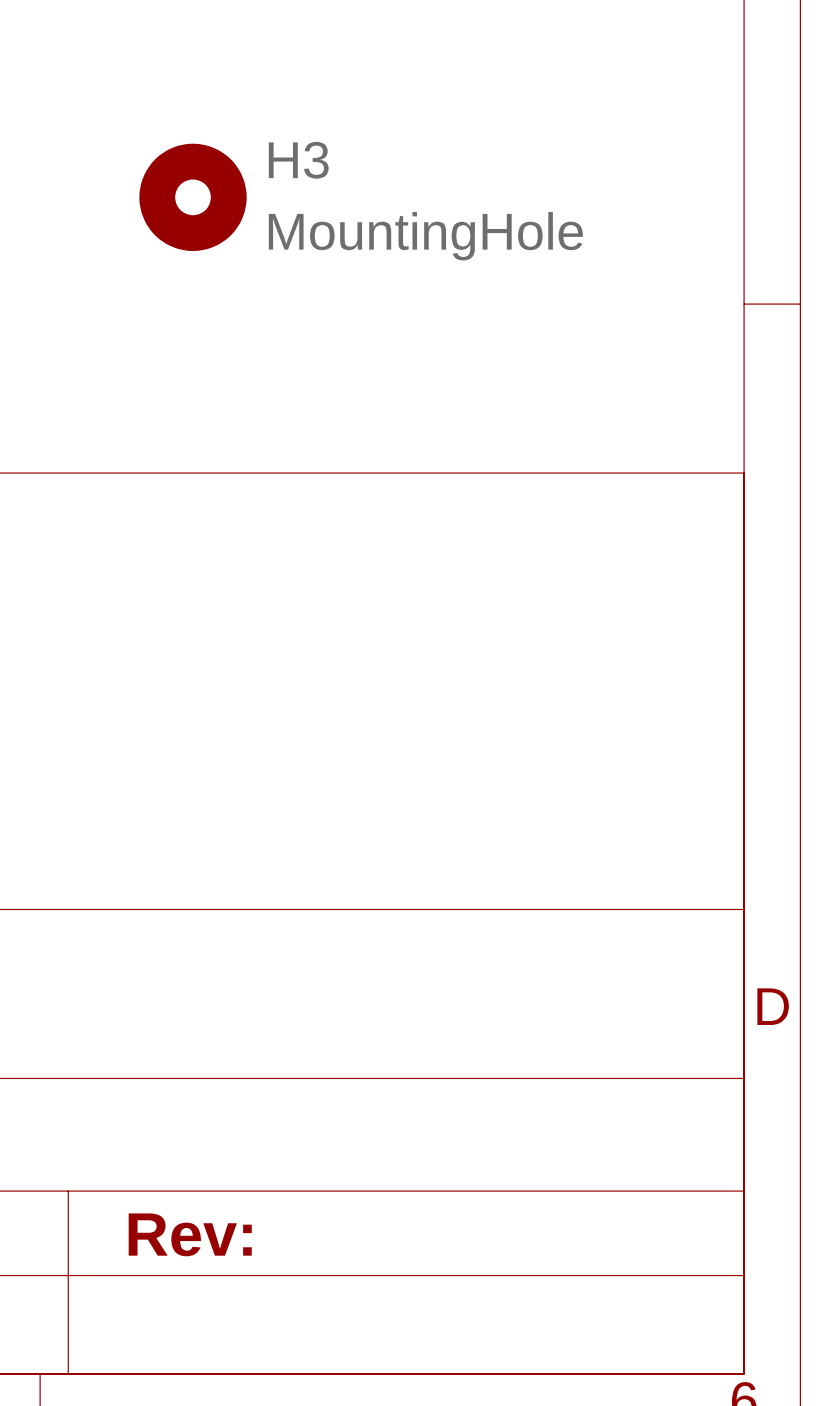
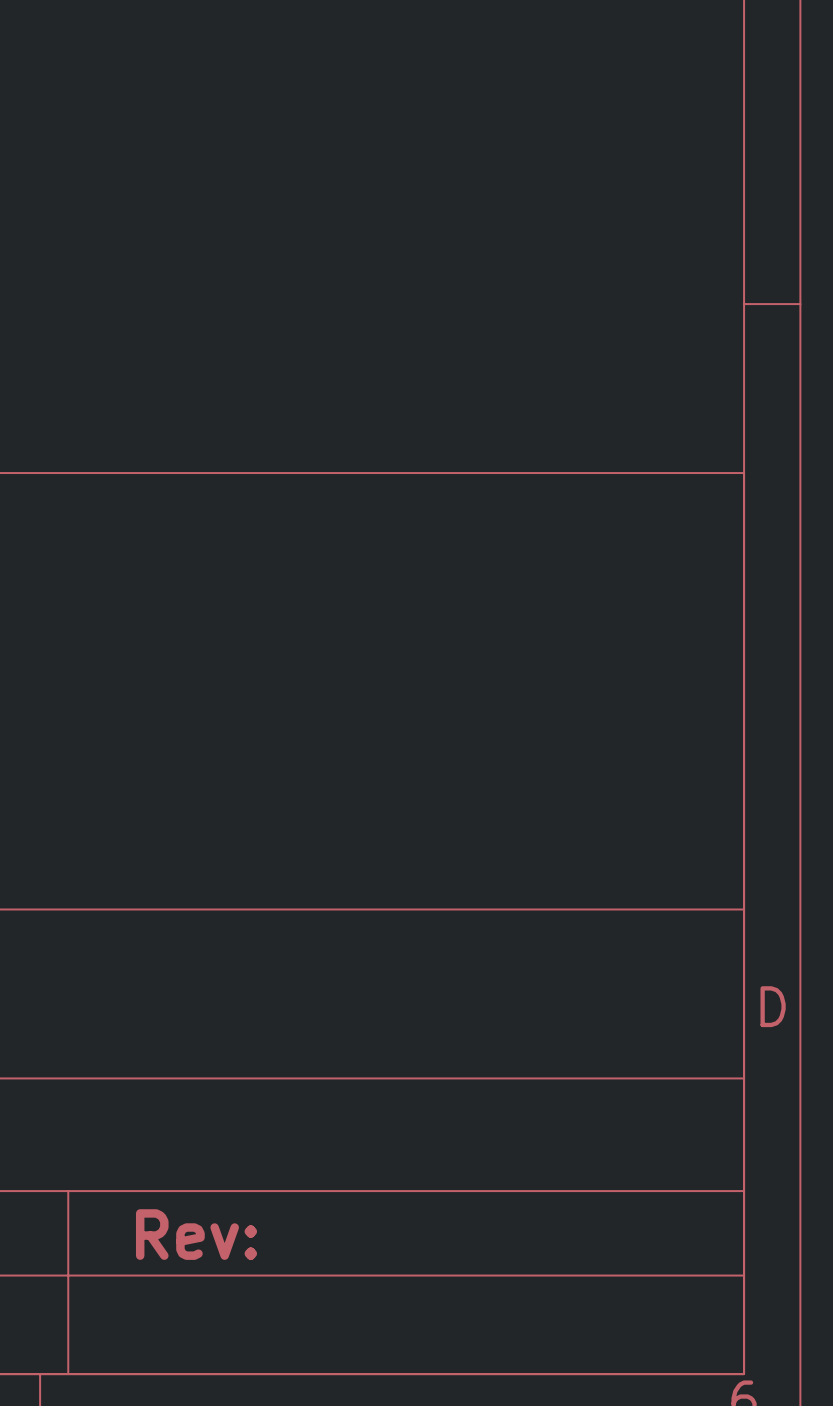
H3: MountingHole (193, 197) -> none

